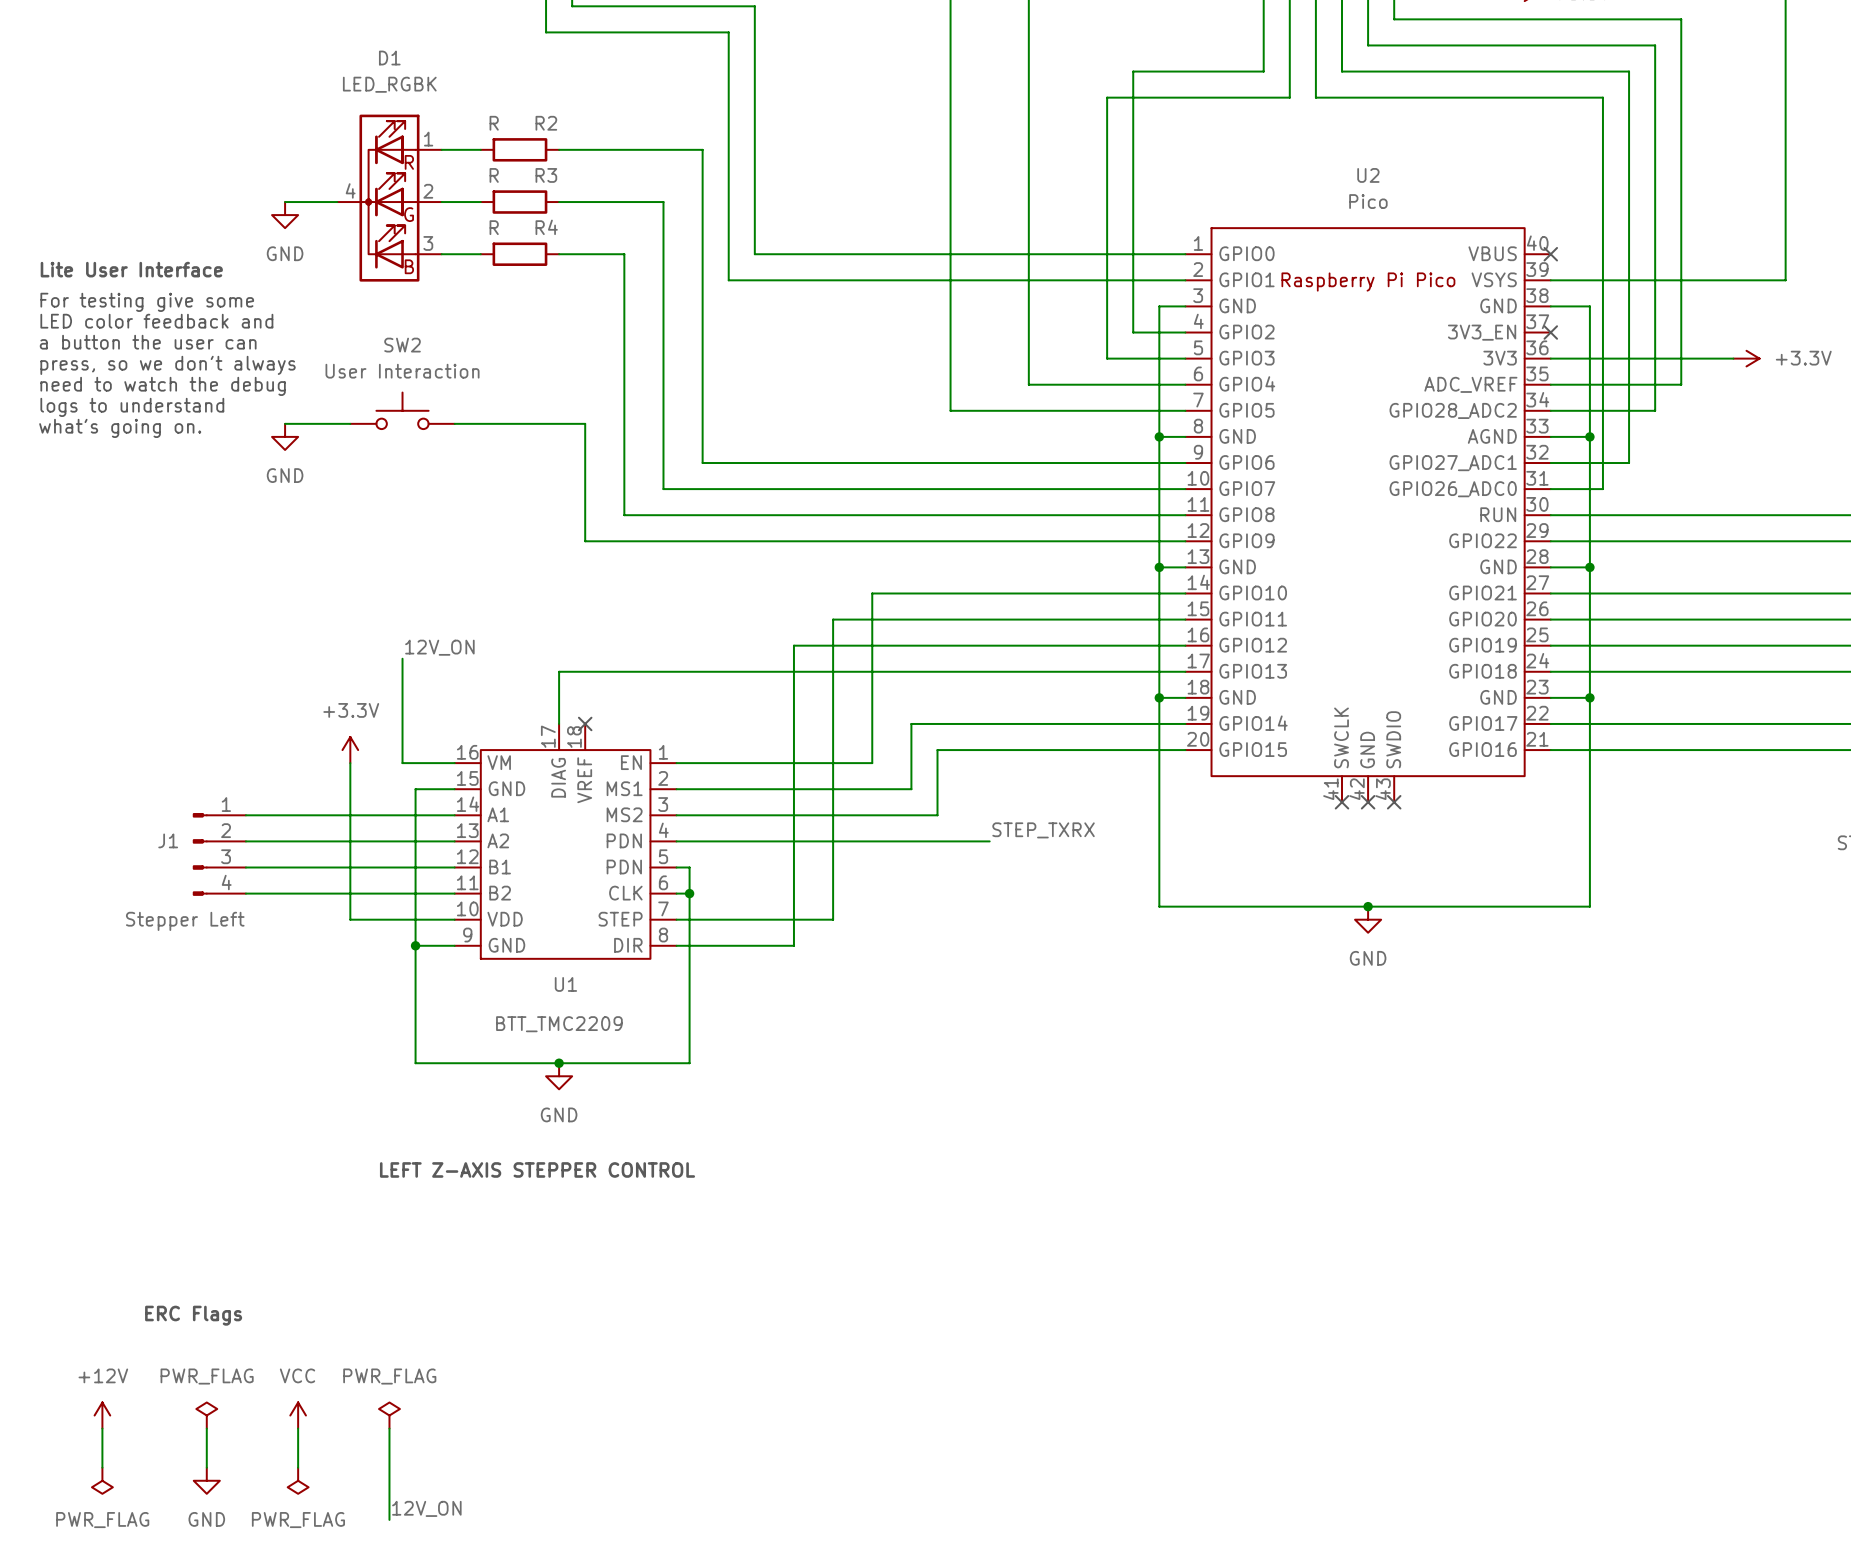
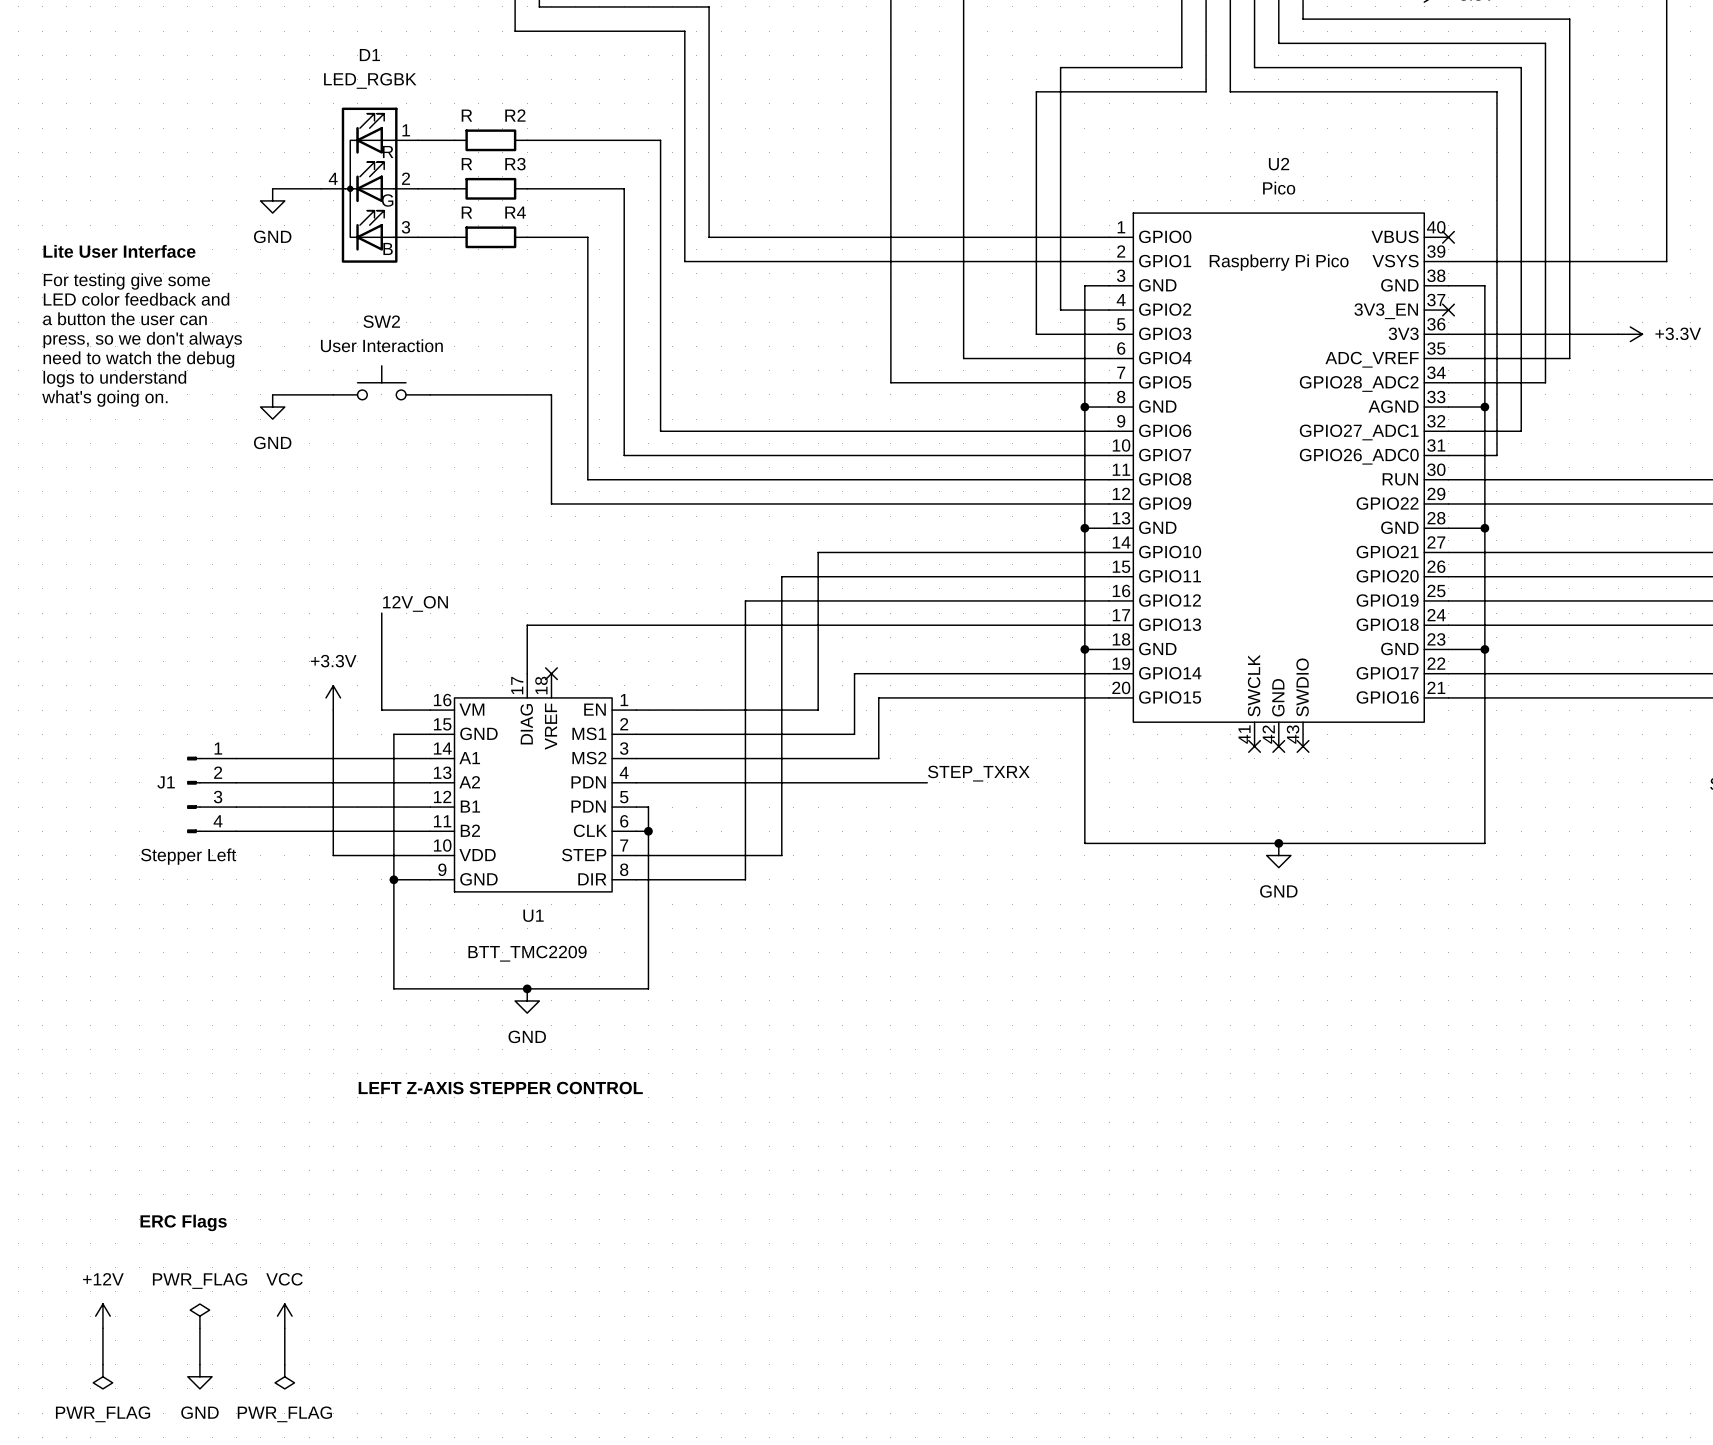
power symbol: PWR_FLAG (389, 1415) -> none
wire: (389, 1428) (389, 1519) -> none
label: 12V_ON (426, 1508) -> none

